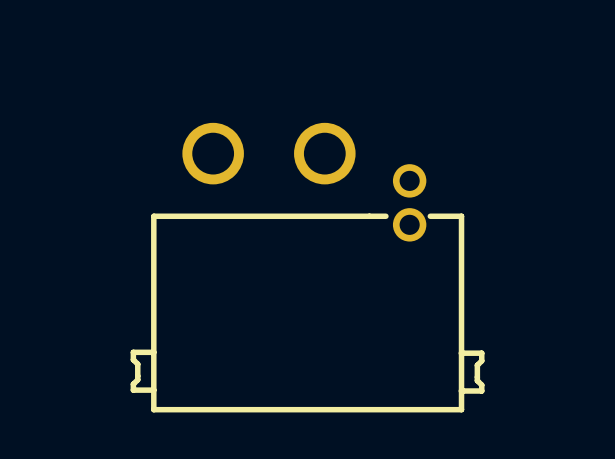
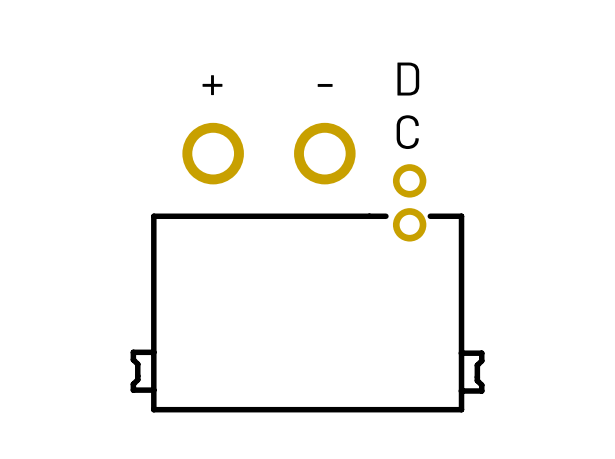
text: none -> D (408, 79)
text: none -> + (212, 85)
text: none -> - (325, 85)
text: none -> C (407, 132)

